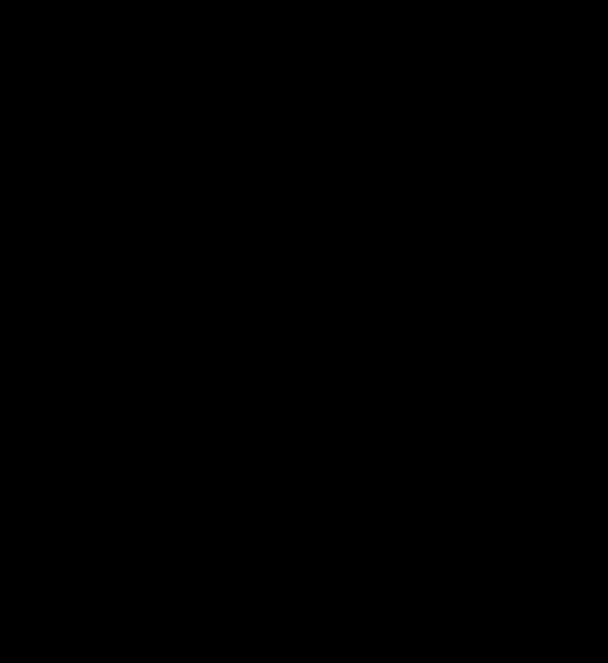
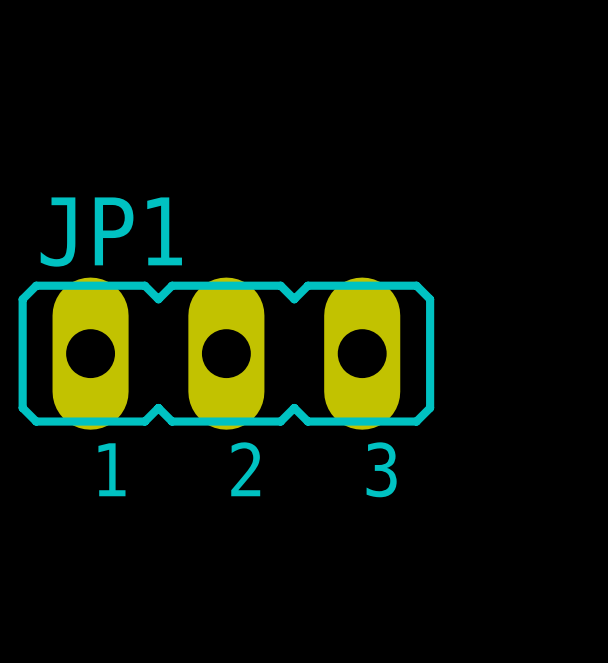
JP1: none -> (226, 353)

